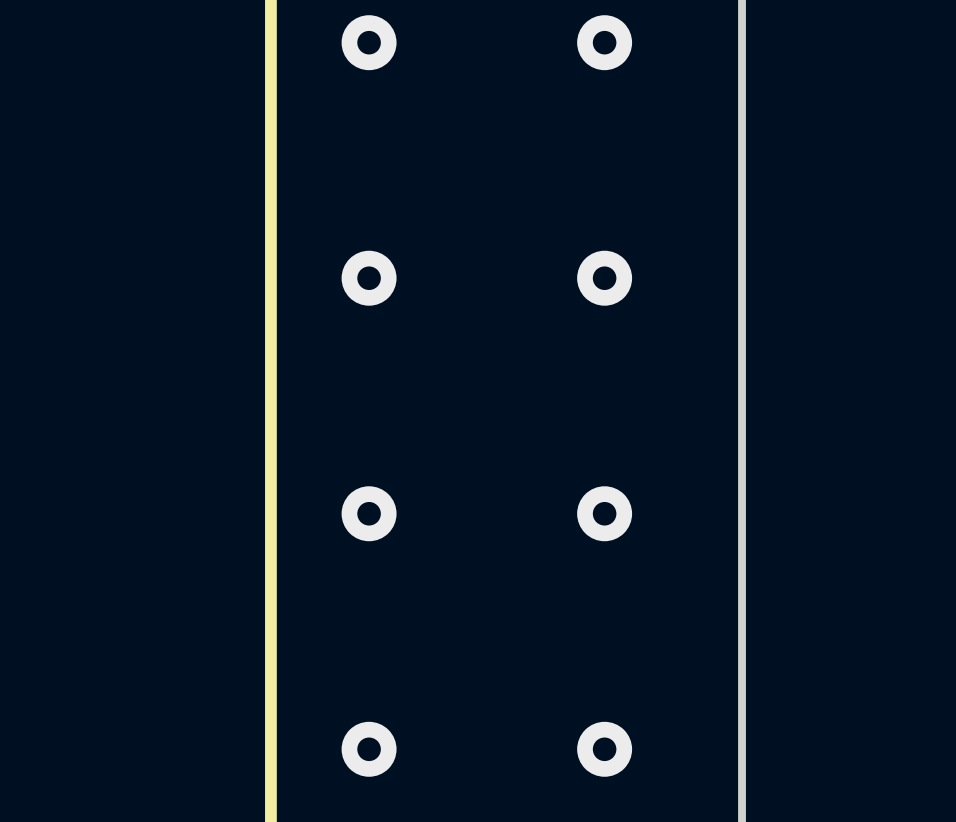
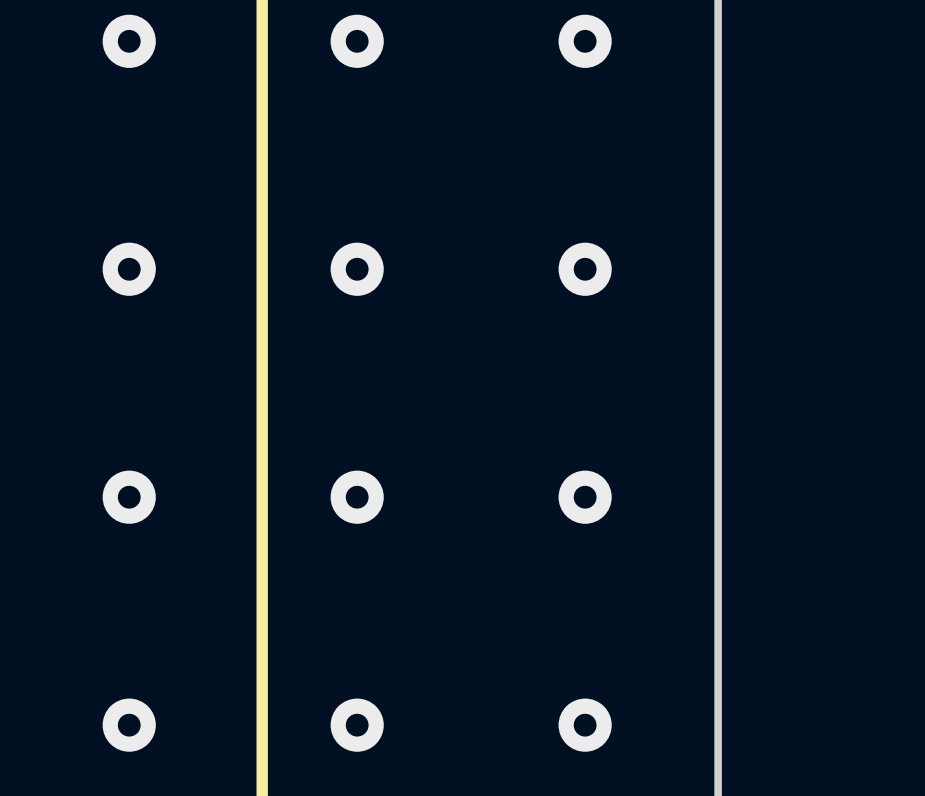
via: none -> (129, 41)
via: none -> (129, 269)
via: none -> (129, 497)
via: none -> (129, 725)

